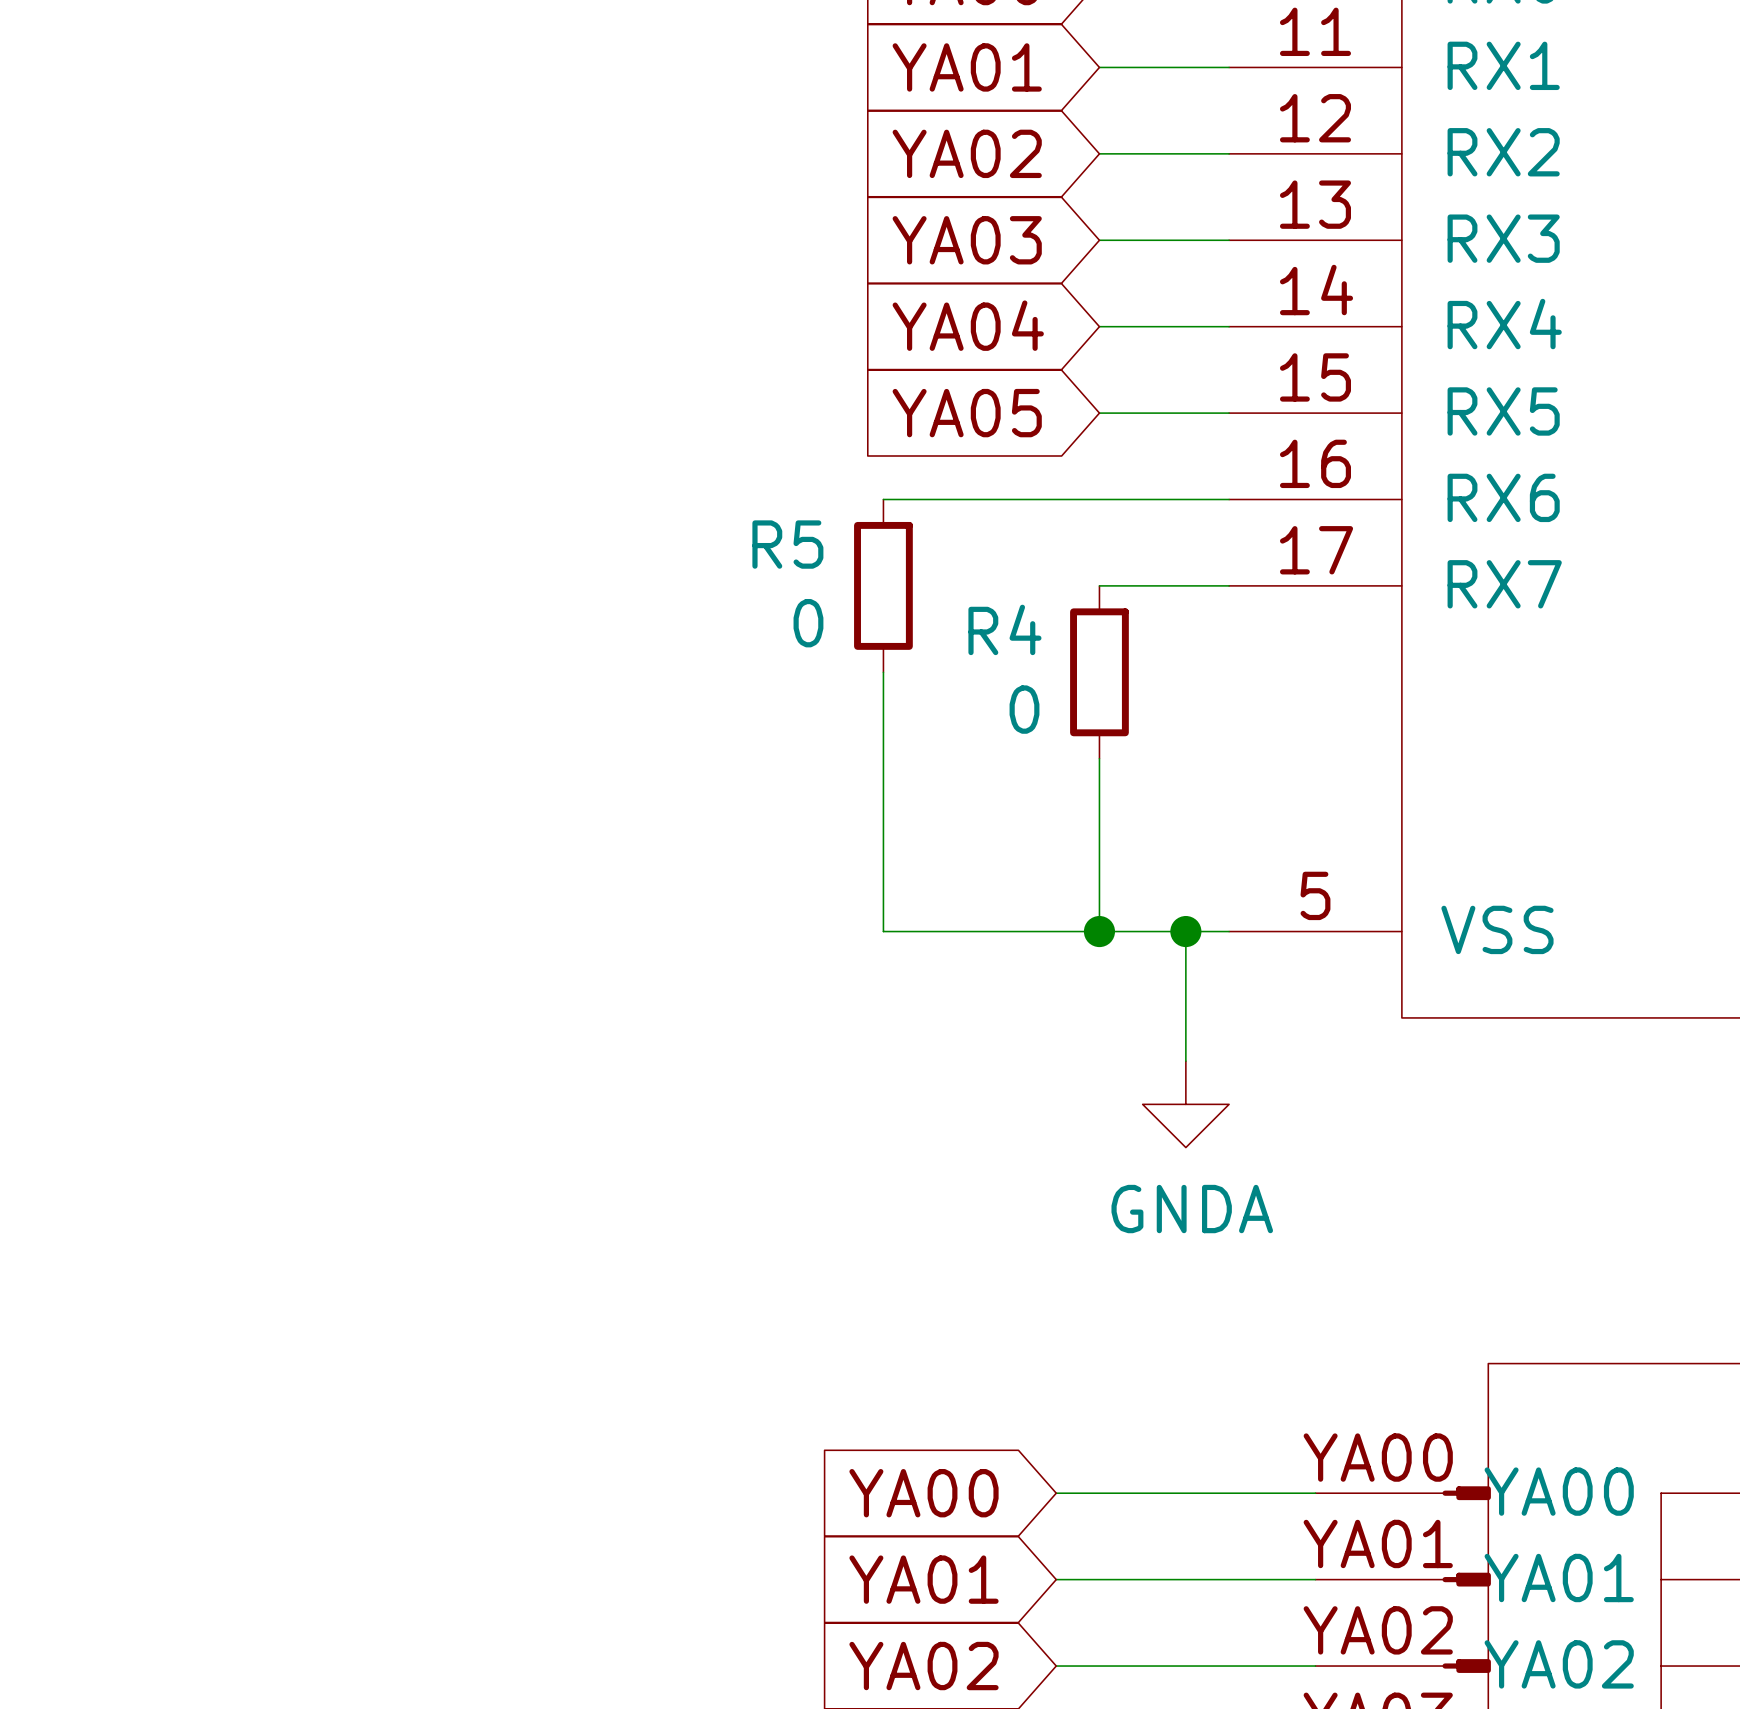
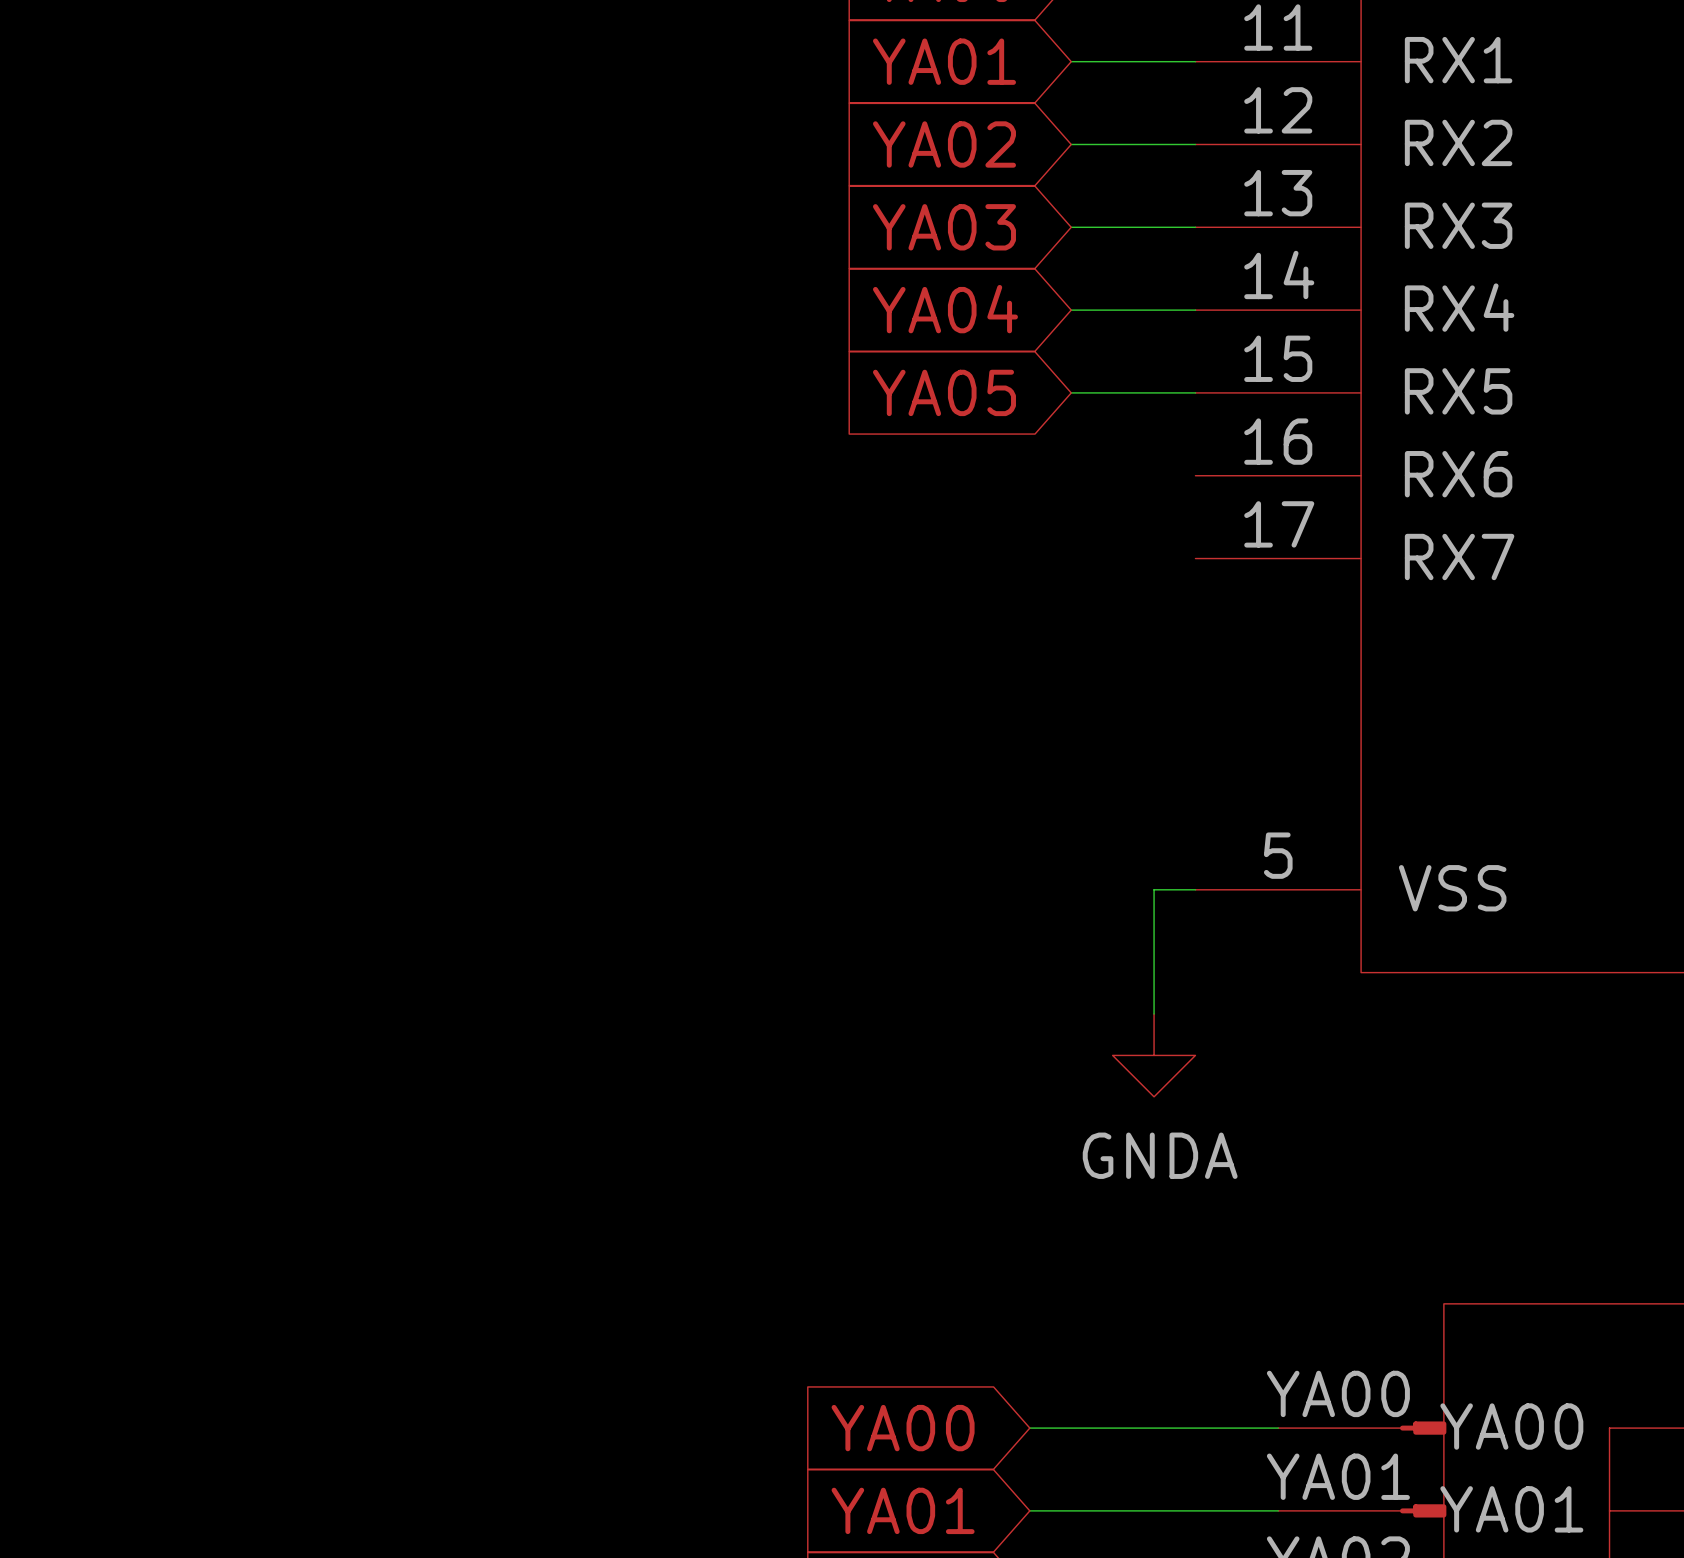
wire: (883, 499) (1229, 499) -> none
R5: 0 (883, 585) -> none
wire: (1099, 585) (1229, 585) -> none
wire: (883, 672) (883, 931) (1185, 931) -> none
R4: 0 (1099, 672) -> none
wire: (1099, 758) (1099, 931) -> none
junction: (1099, 931) -> none
junction: (1185, 931) -> none

